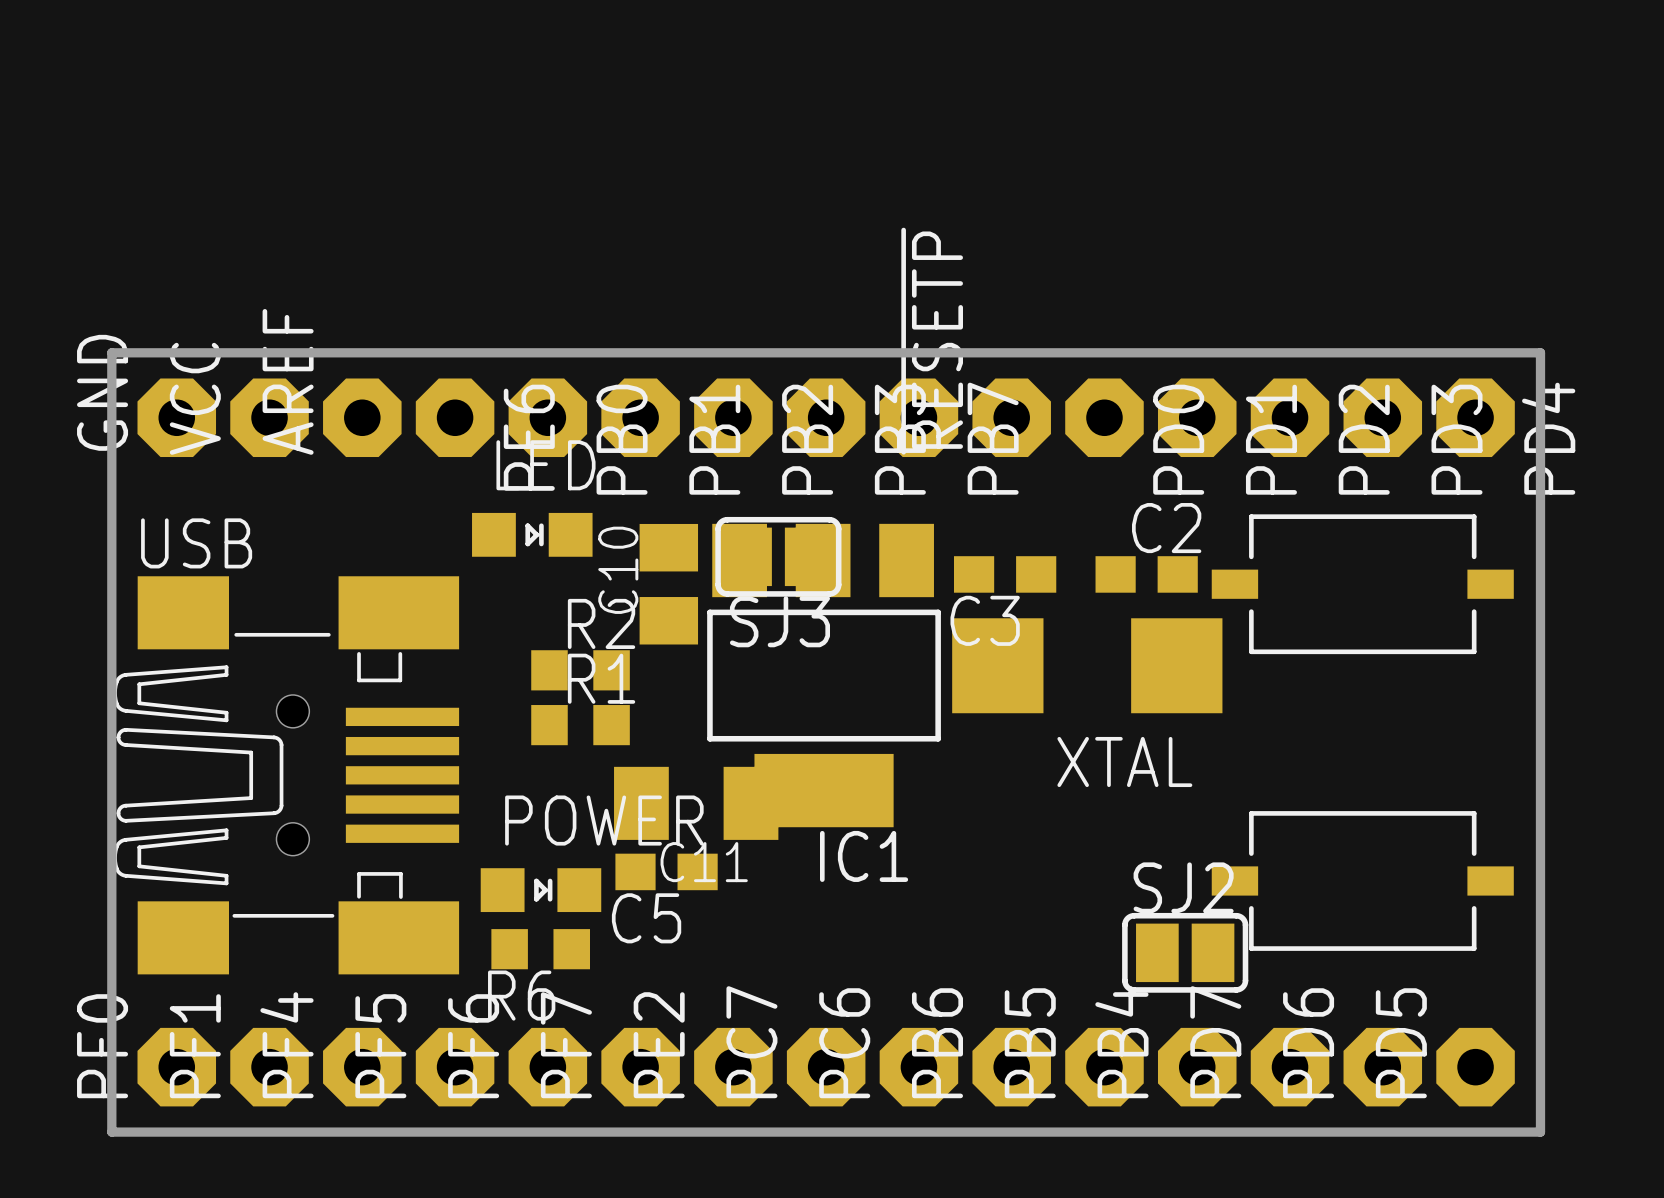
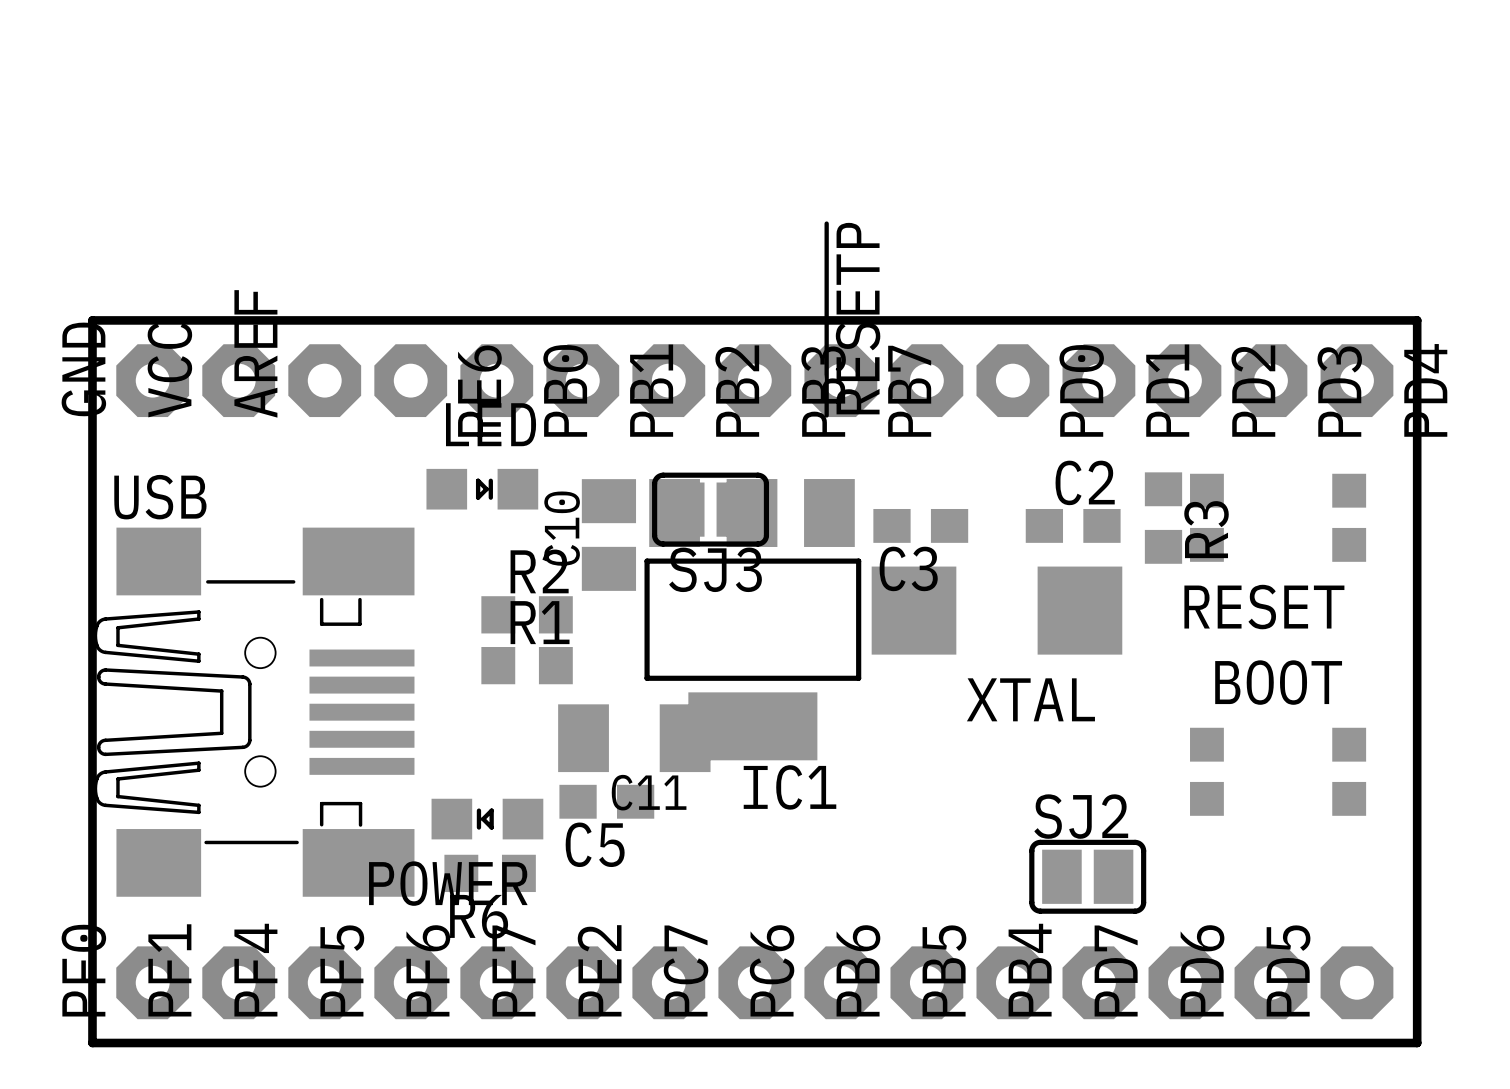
R3: none -> (1163, 518)
RESET: none -> (1278, 517)
C2 position: (1146, 574) -> (1073, 525)
part: (1362, 584) -> none
BOOT: none -> (1278, 771)
part: (1362, 880) -> none
POWER rotation: 0° (540, 890) -> 180° (487, 819)

